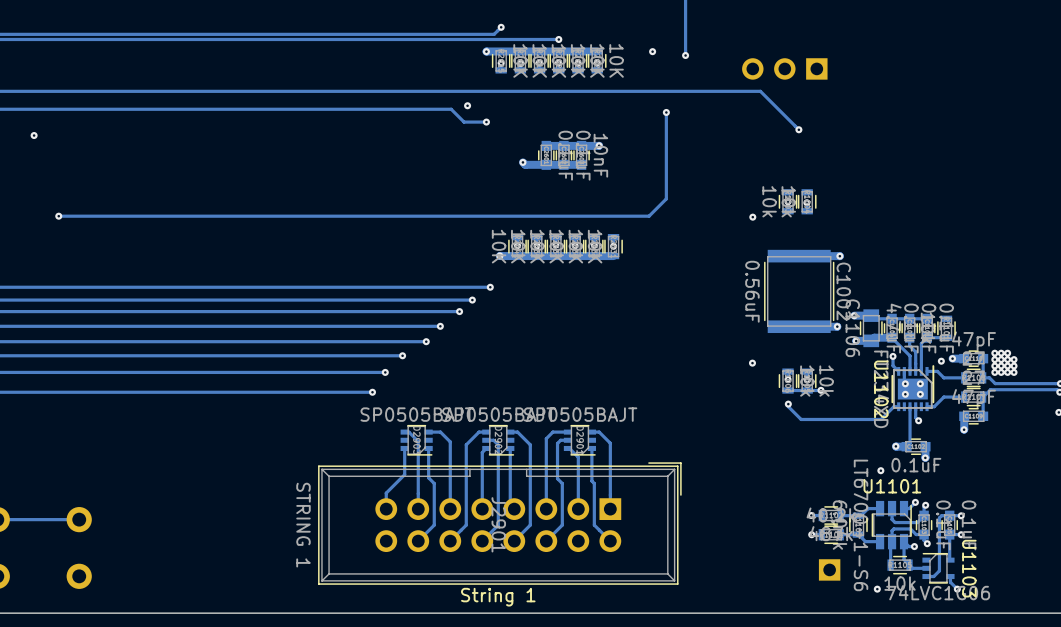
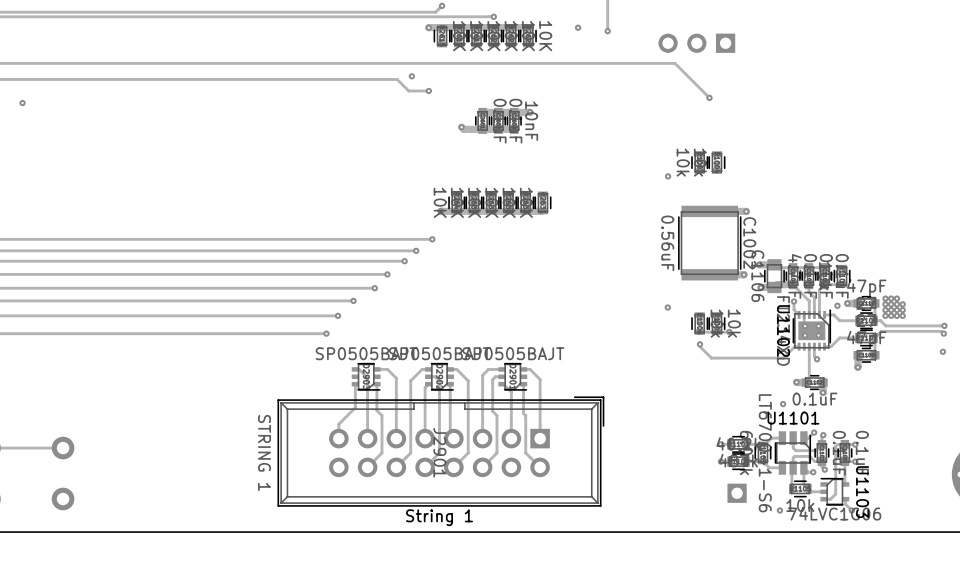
track: (666, 112) (666, 198) (649, 216) (58, 216) -> none
via: (666, 112) -> none
via: (58, 216) -> none

